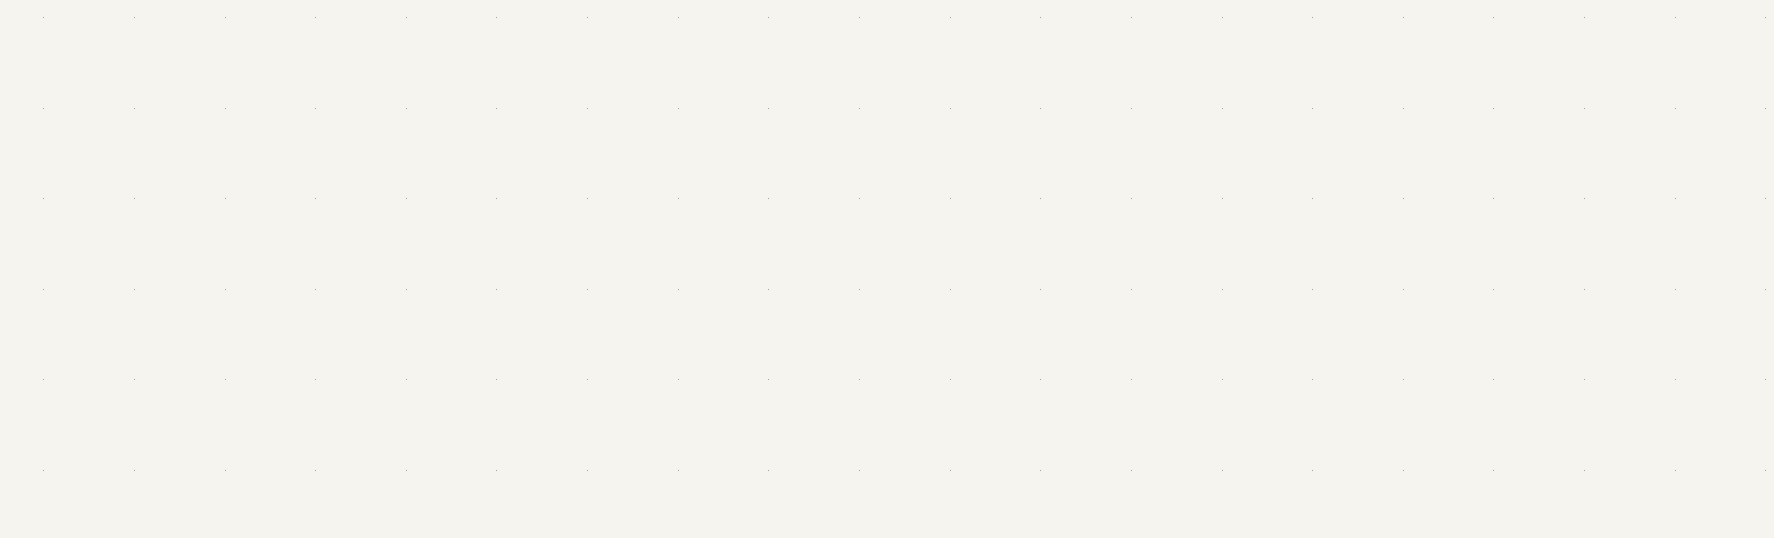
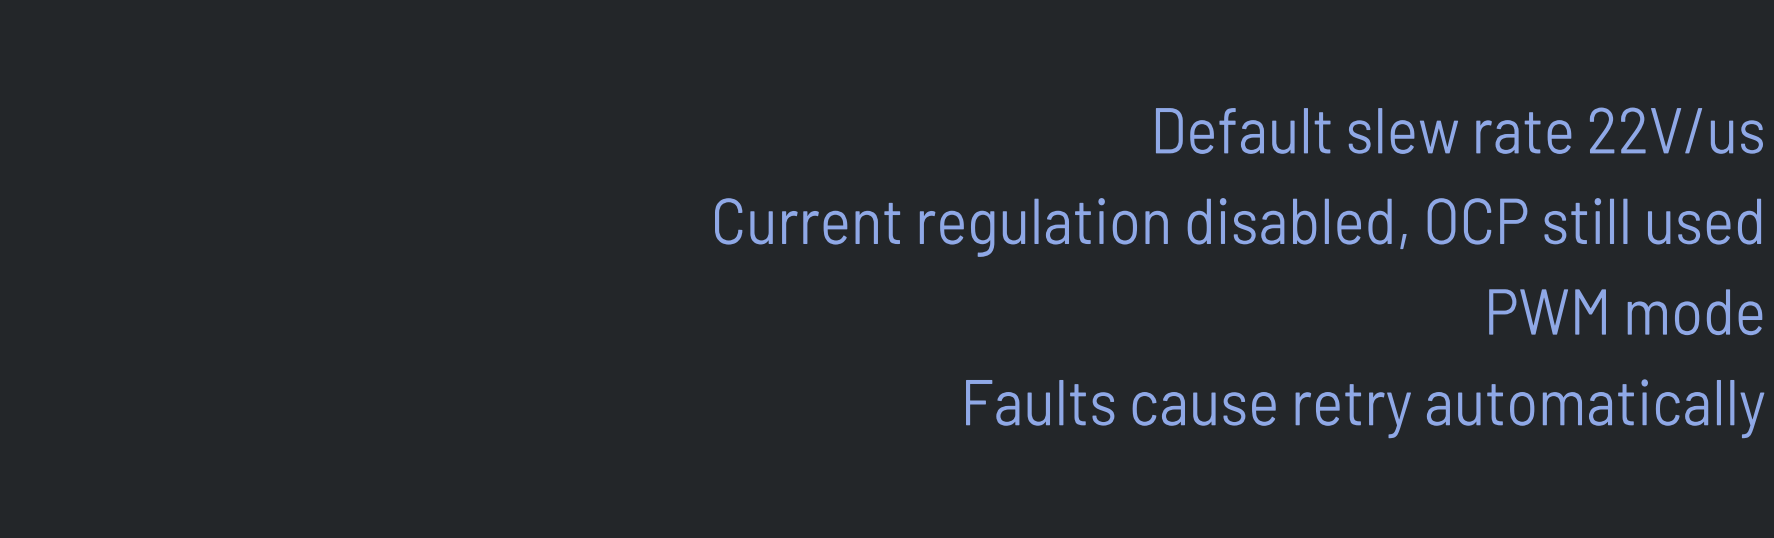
text: none -> Default slew rate 22V/us (1459, 130)
text: none -> Current regulation disabled, OCP still used (1238, 227)
text: none -> PWM mode (1625, 312)
text: none -> Faults cause retry automatically (1365, 408)

